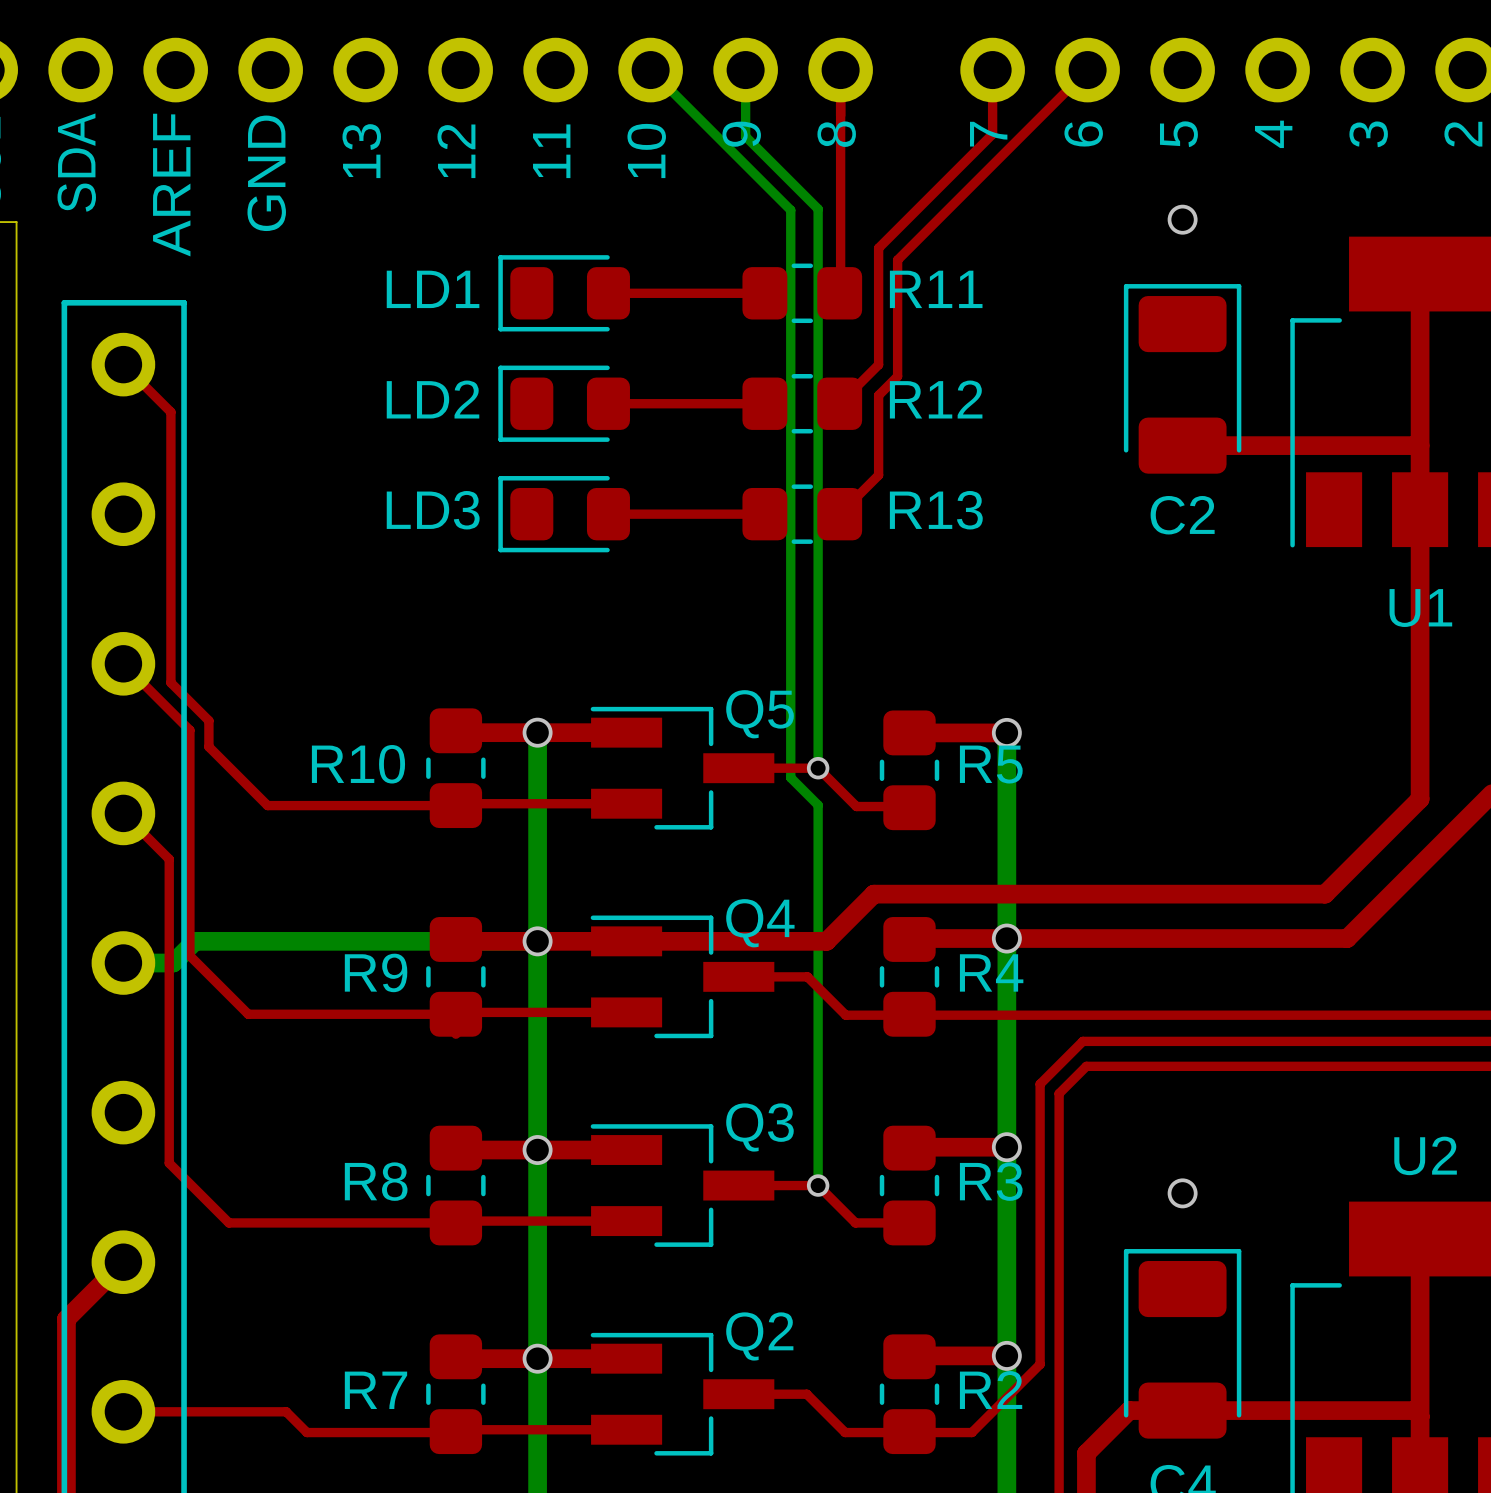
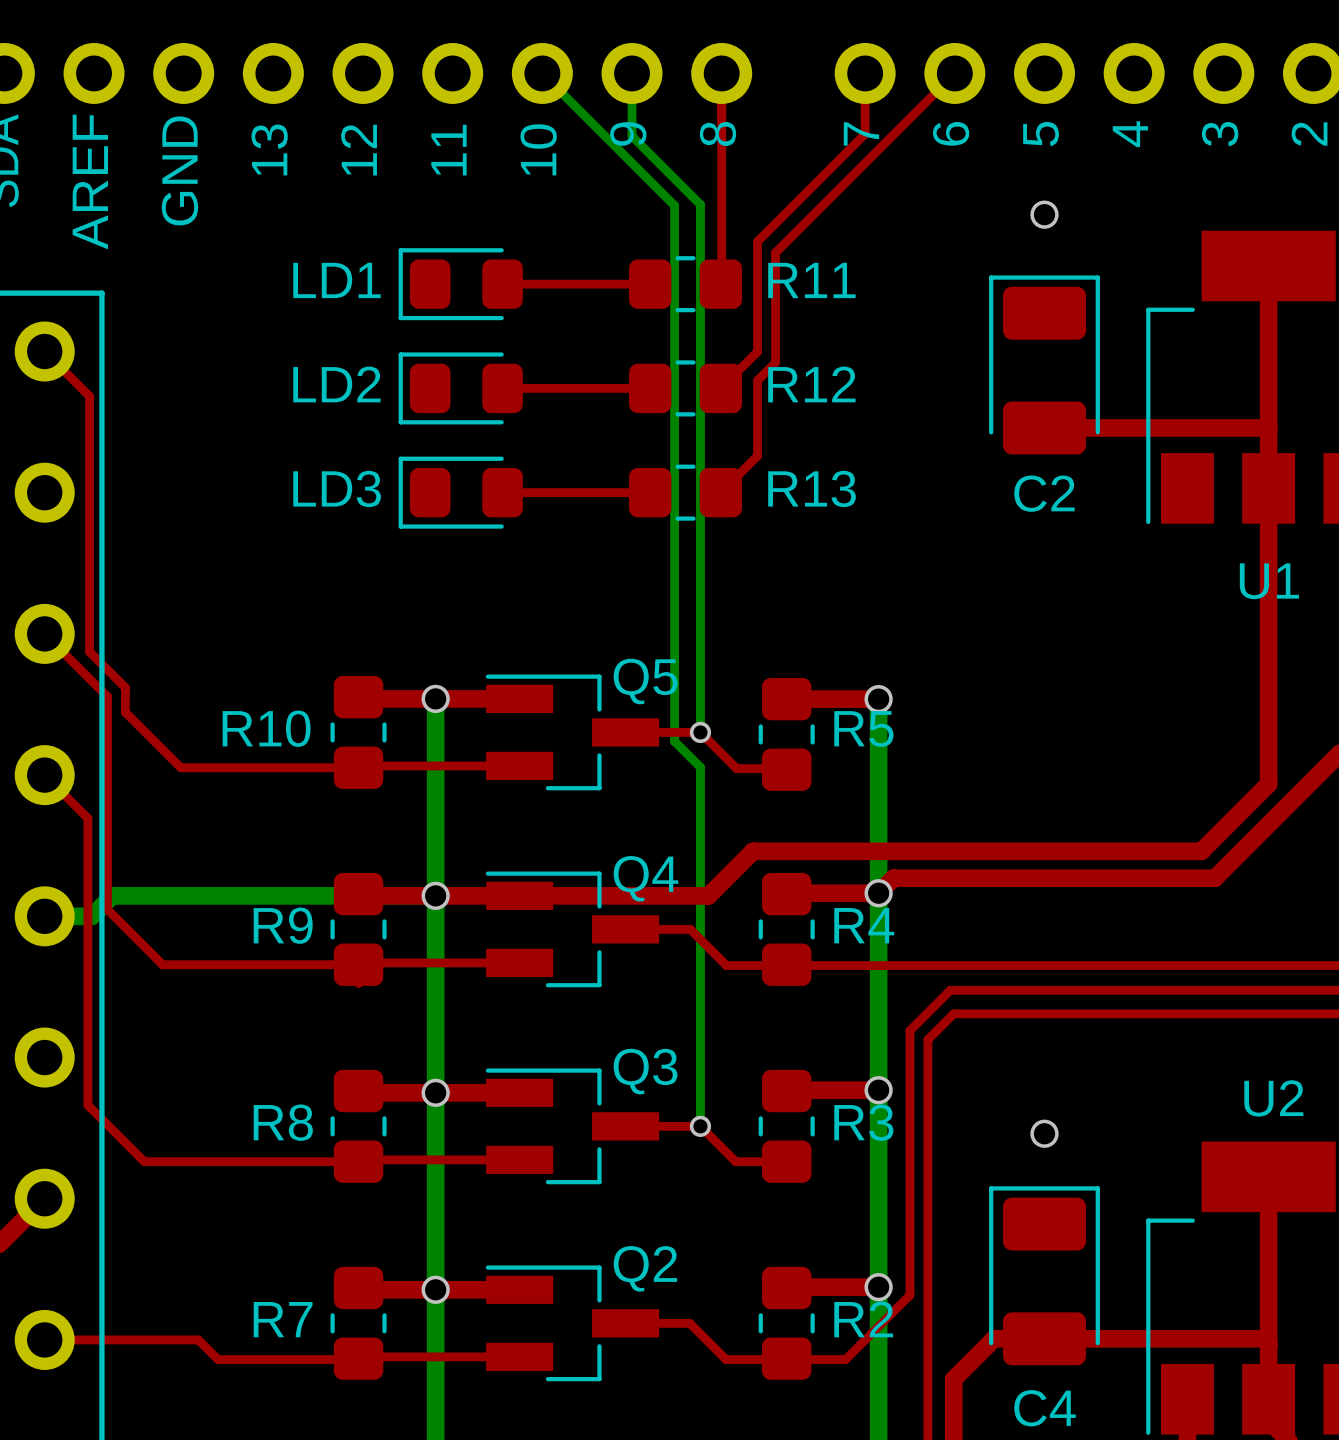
top track: (1420, 799) (1325, 894) -> (1268, 761) (1268, 784) (1201, 851) (1179, 851)
top track: (1363, 922) (1347, 938) (1006, 938) -> (1214, 878) (893, 878) (878, 893)

